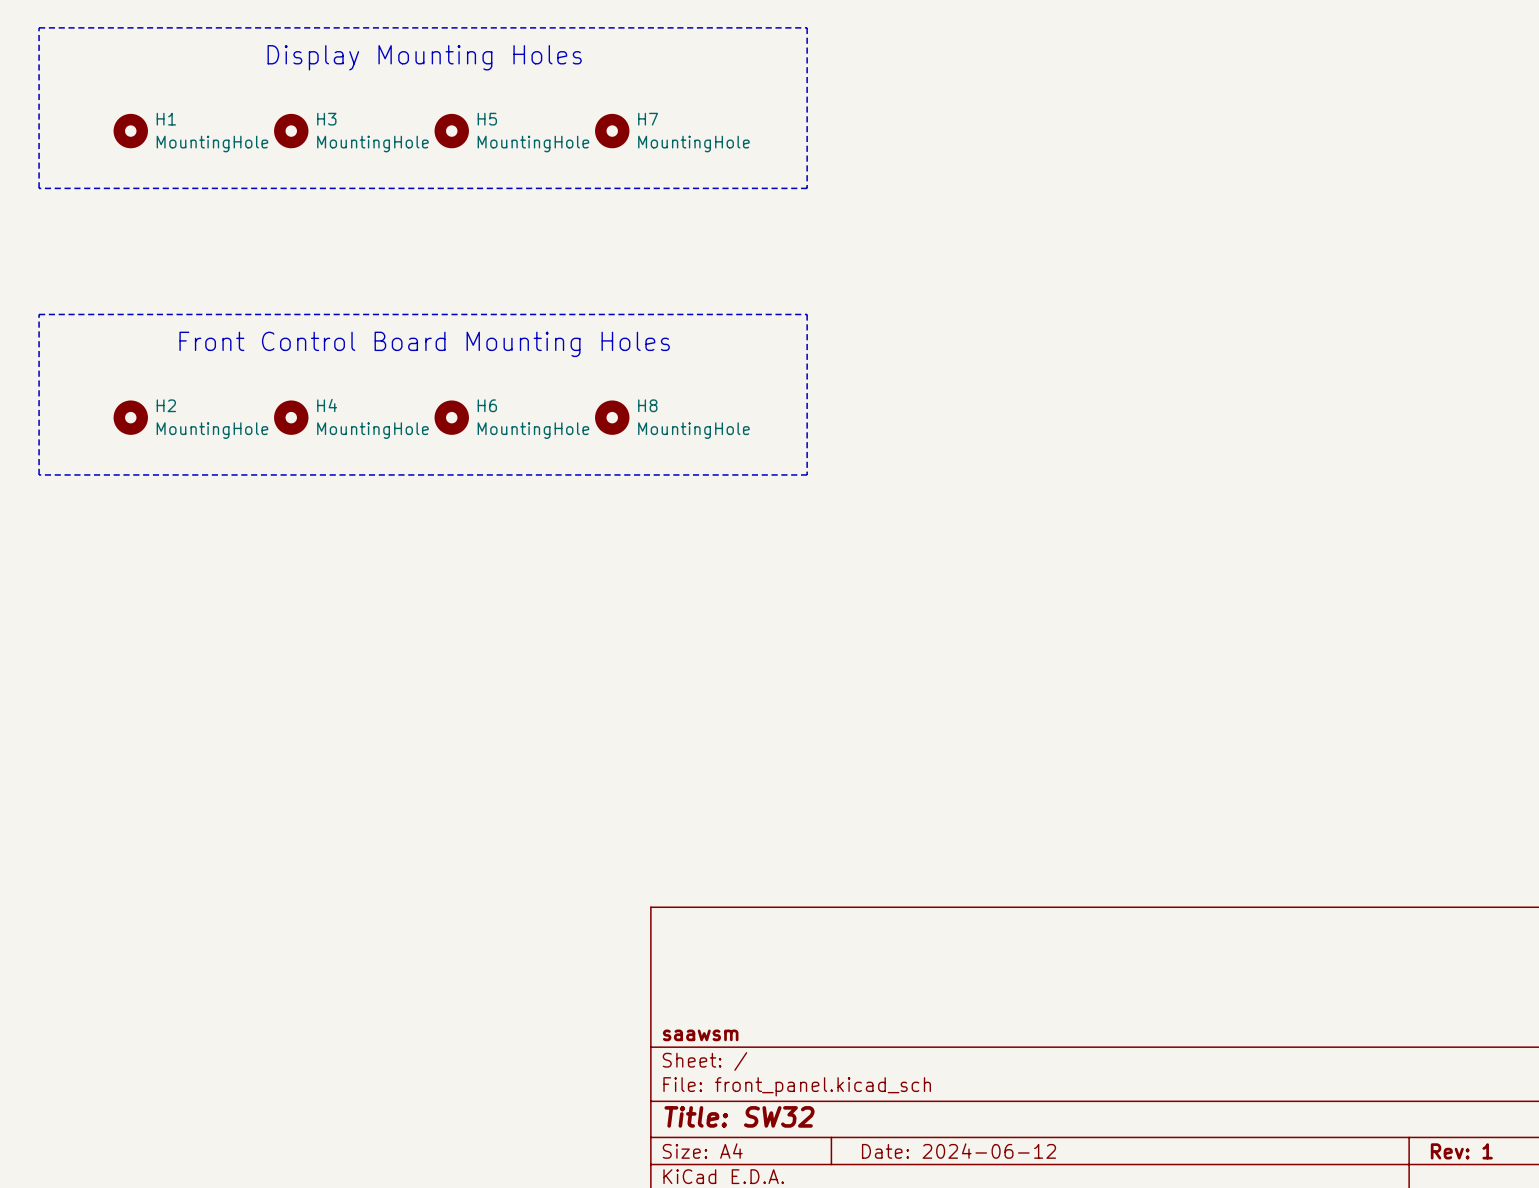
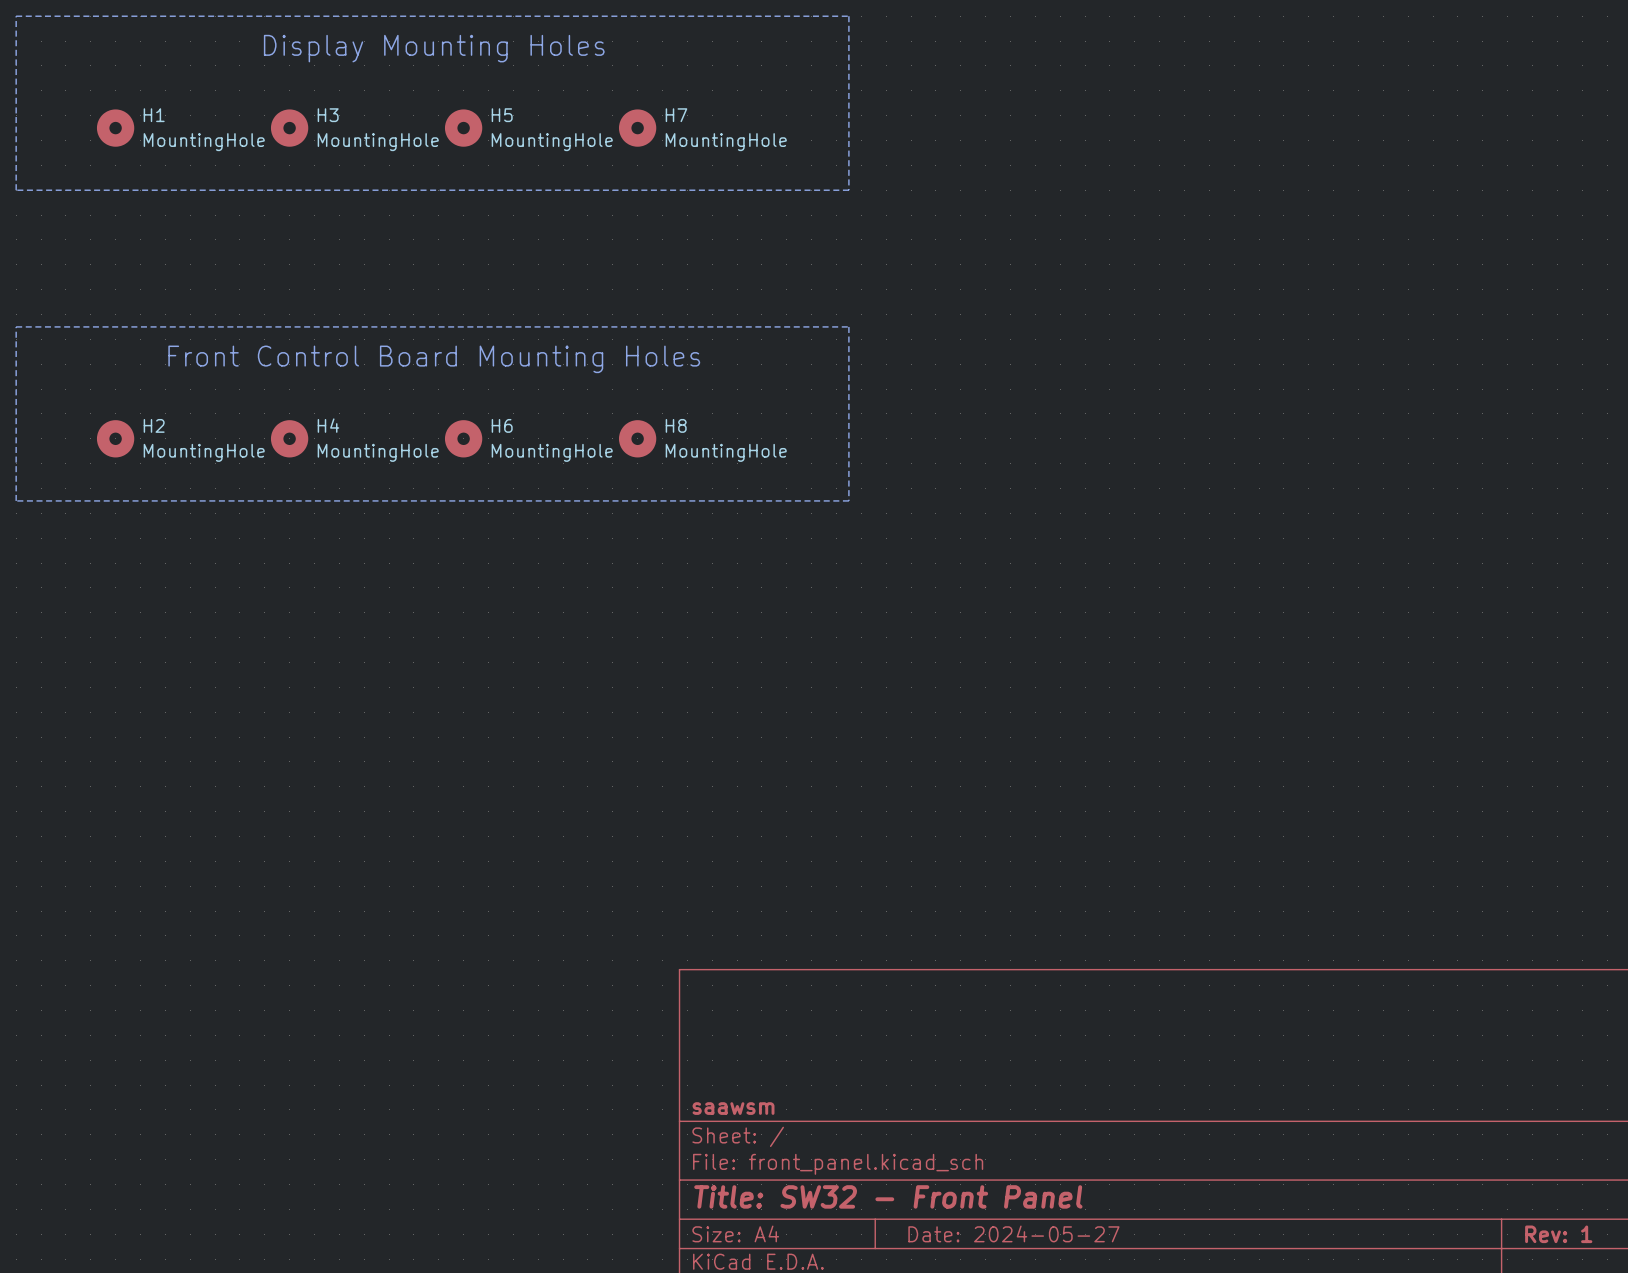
title block: Title: SW32 (739, 1116) -> Title: SW32 - Front Panel (888, 1196)
title block: Date: 2024-06-12 (959, 1151) -> Date: 2024-05-27 (1013, 1233)

